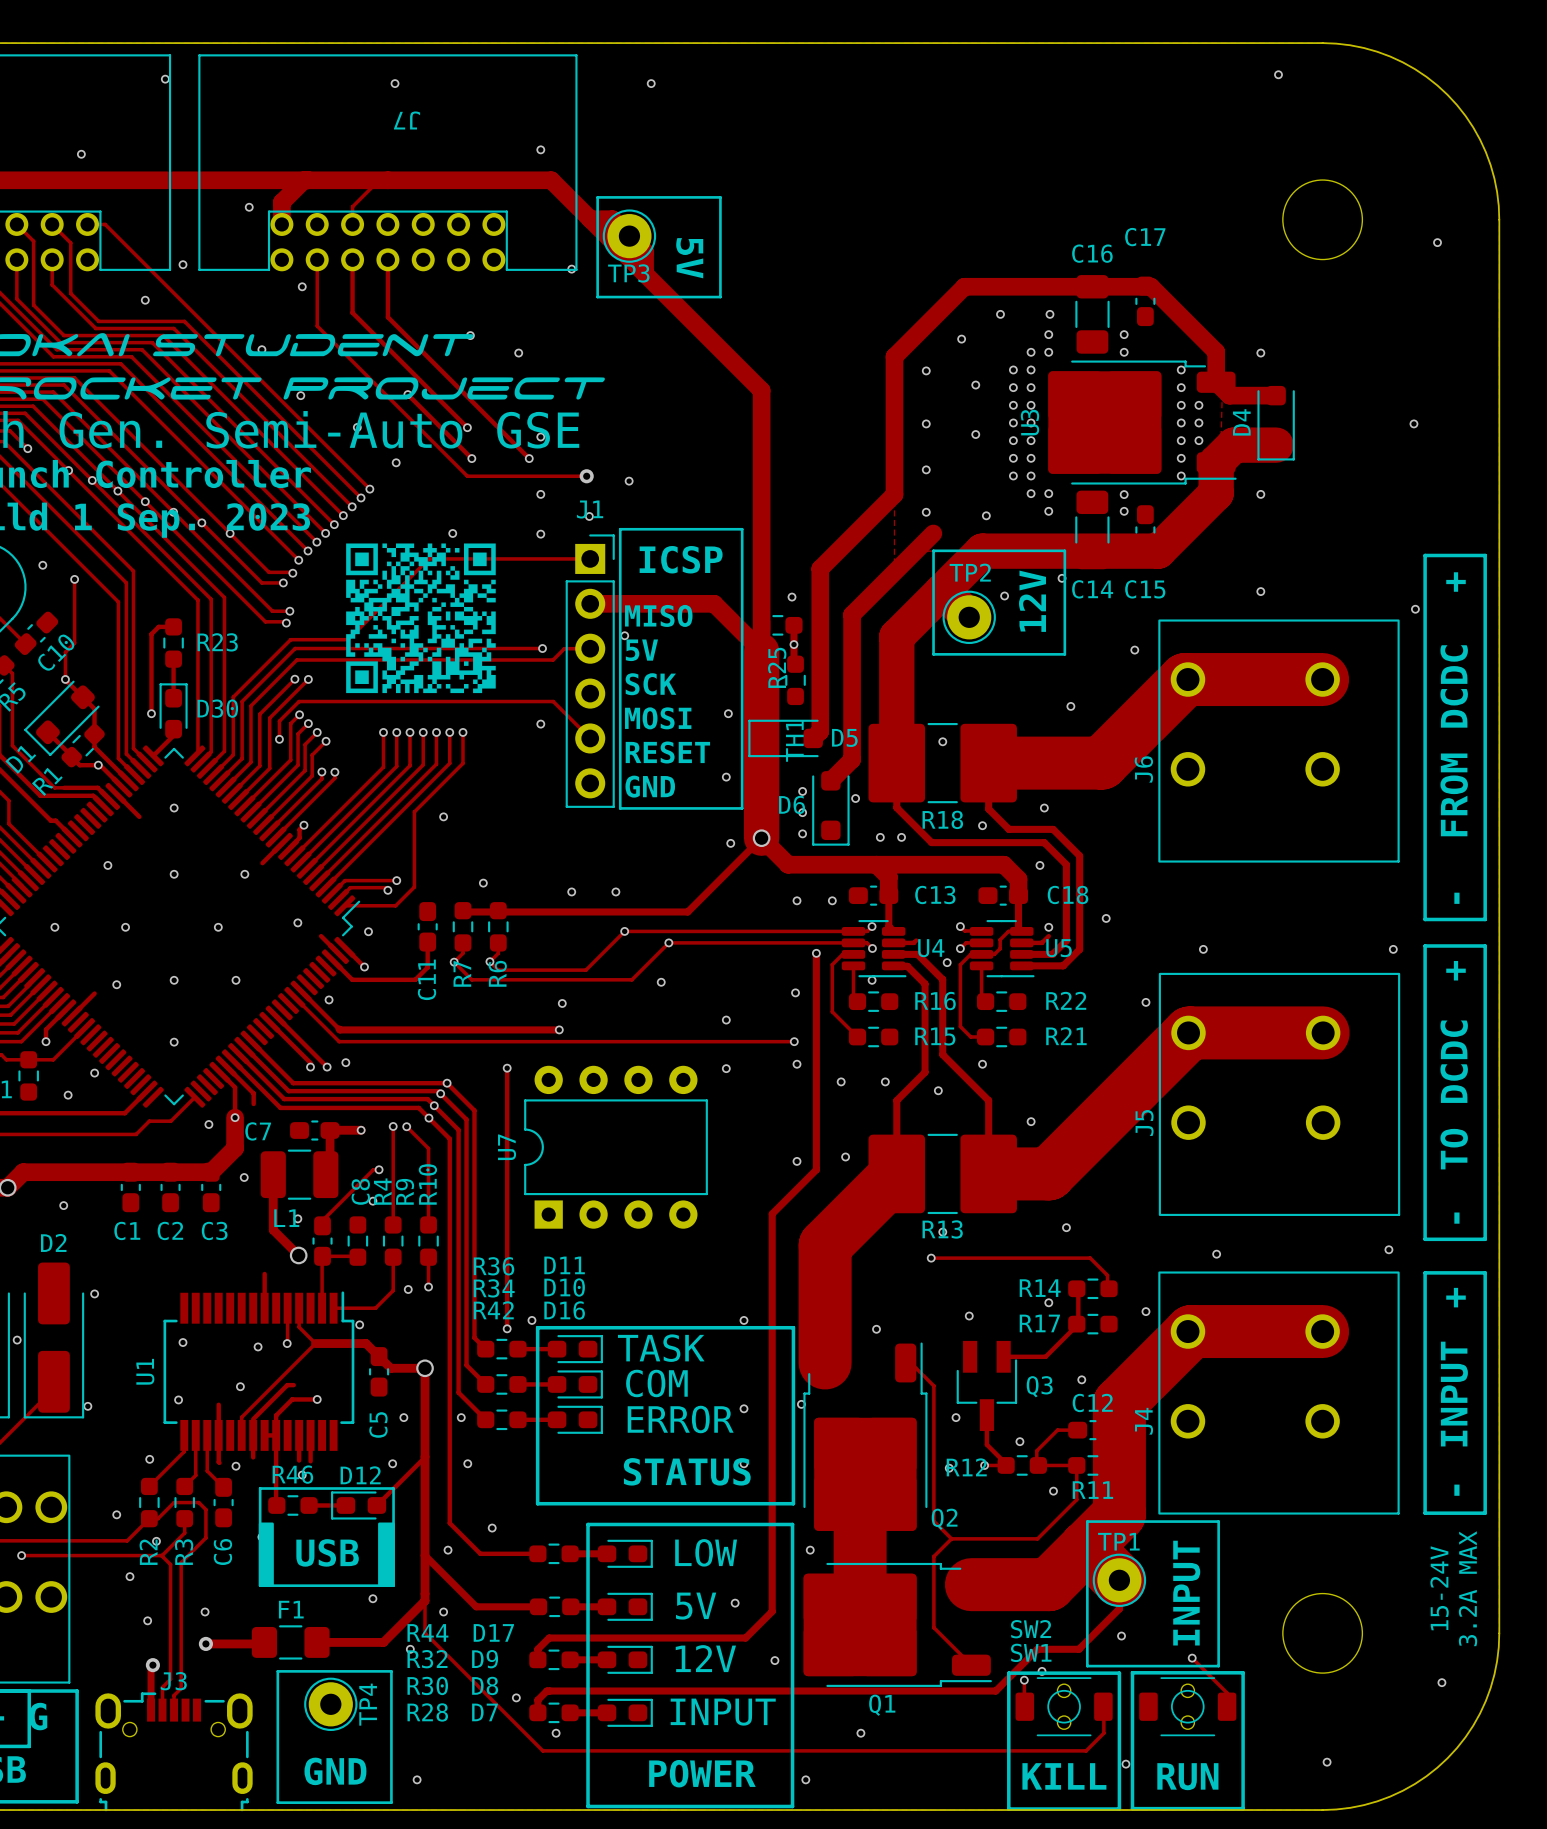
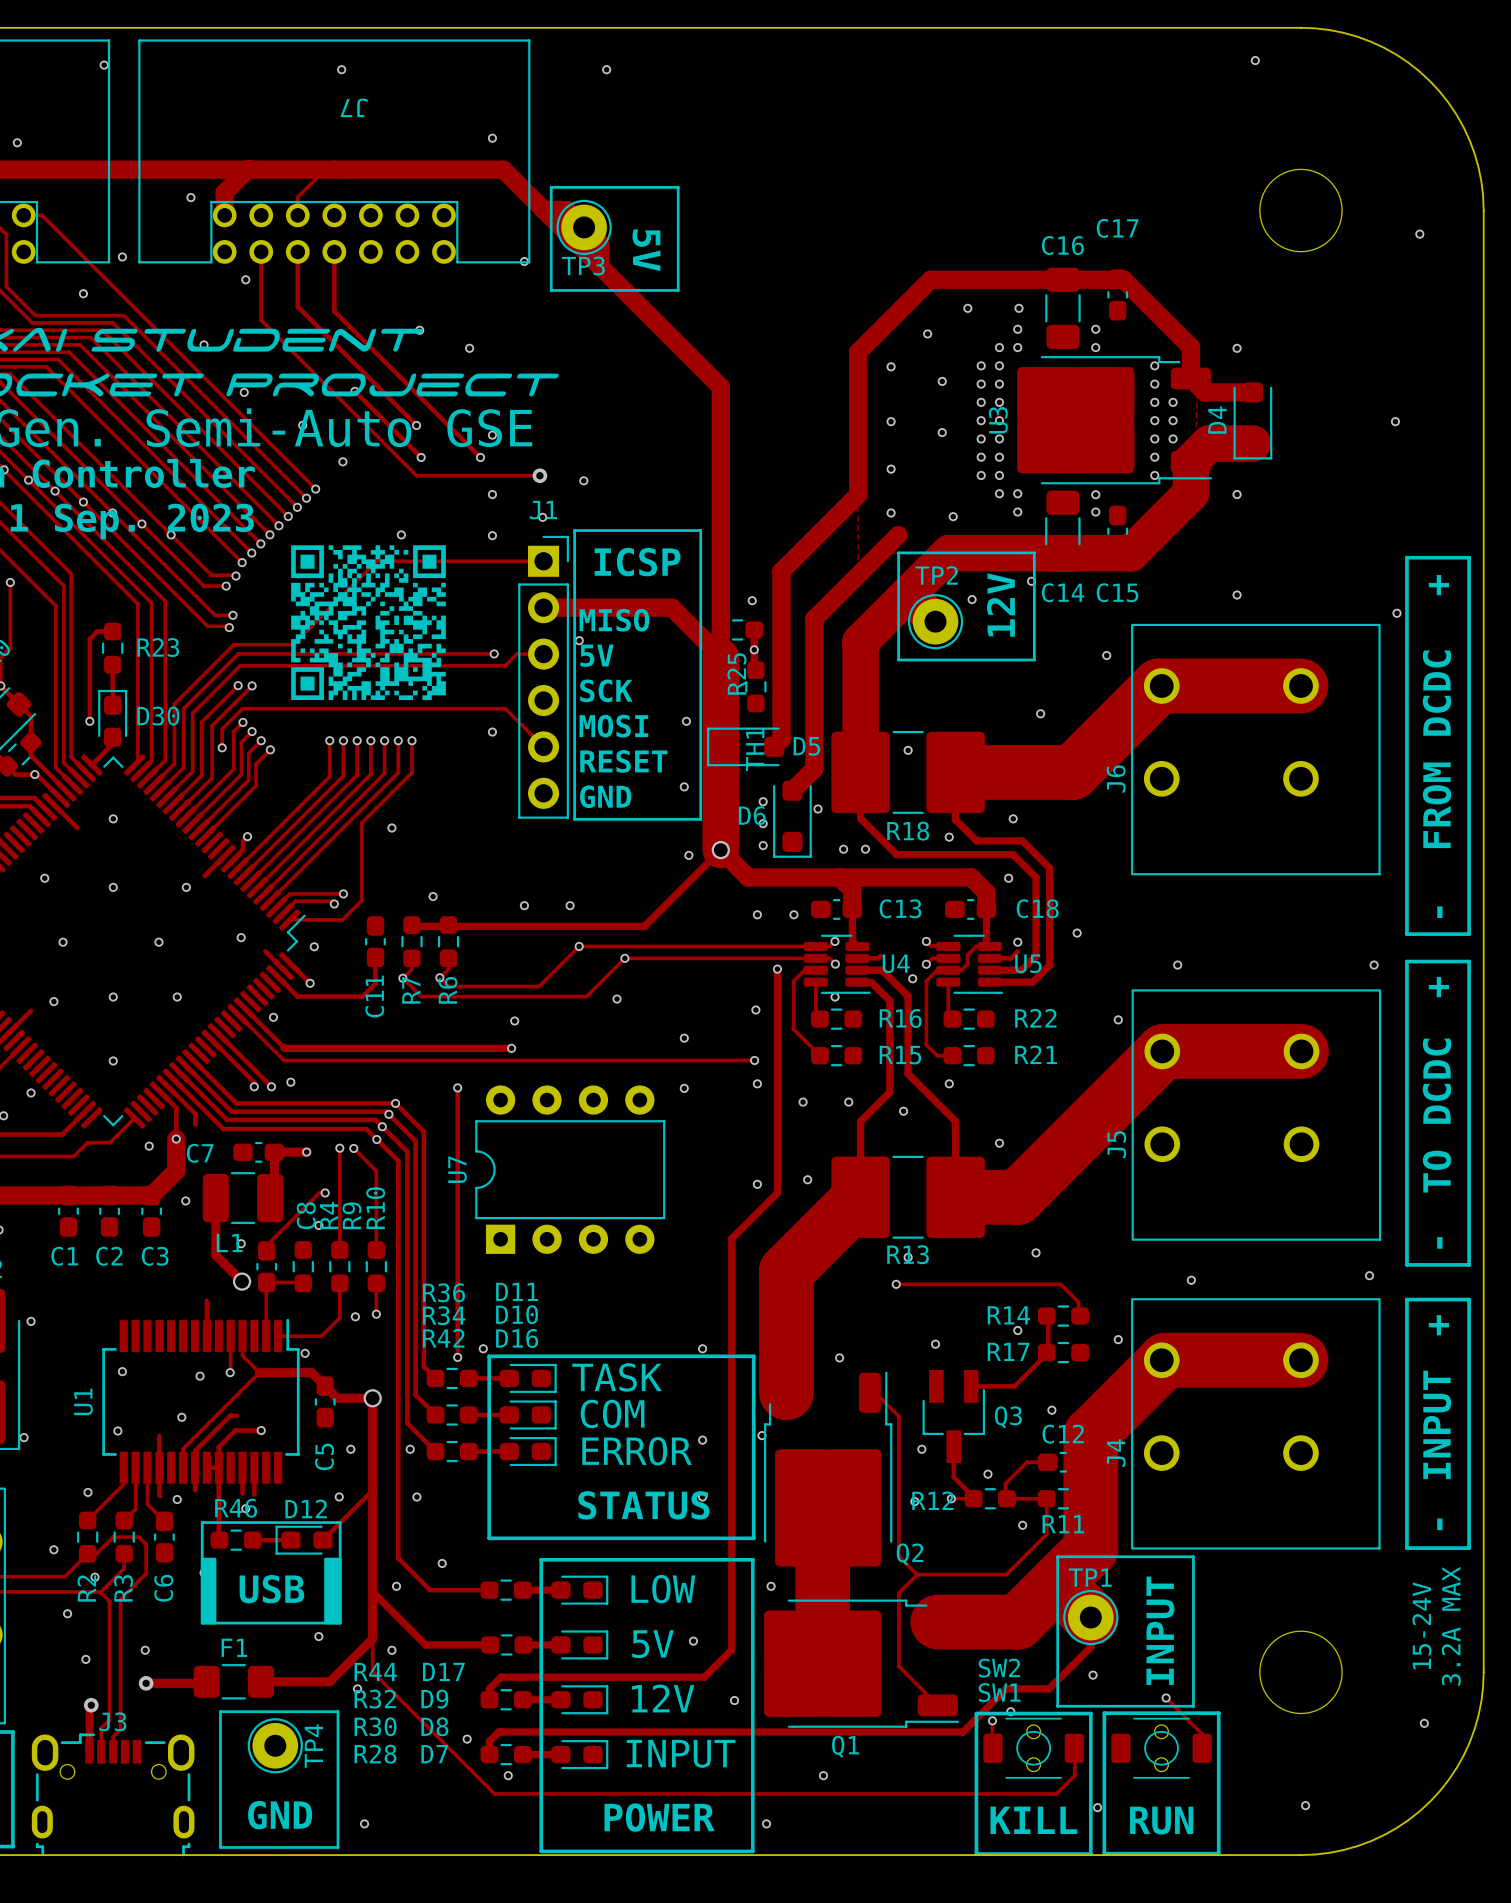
track: (321, 771) (321, 778) (269, 830) -> none
via: (321, 771) -> none
track: (334, 772) (334, 778) (276, 837) -> none
via: (334, 772) -> none

